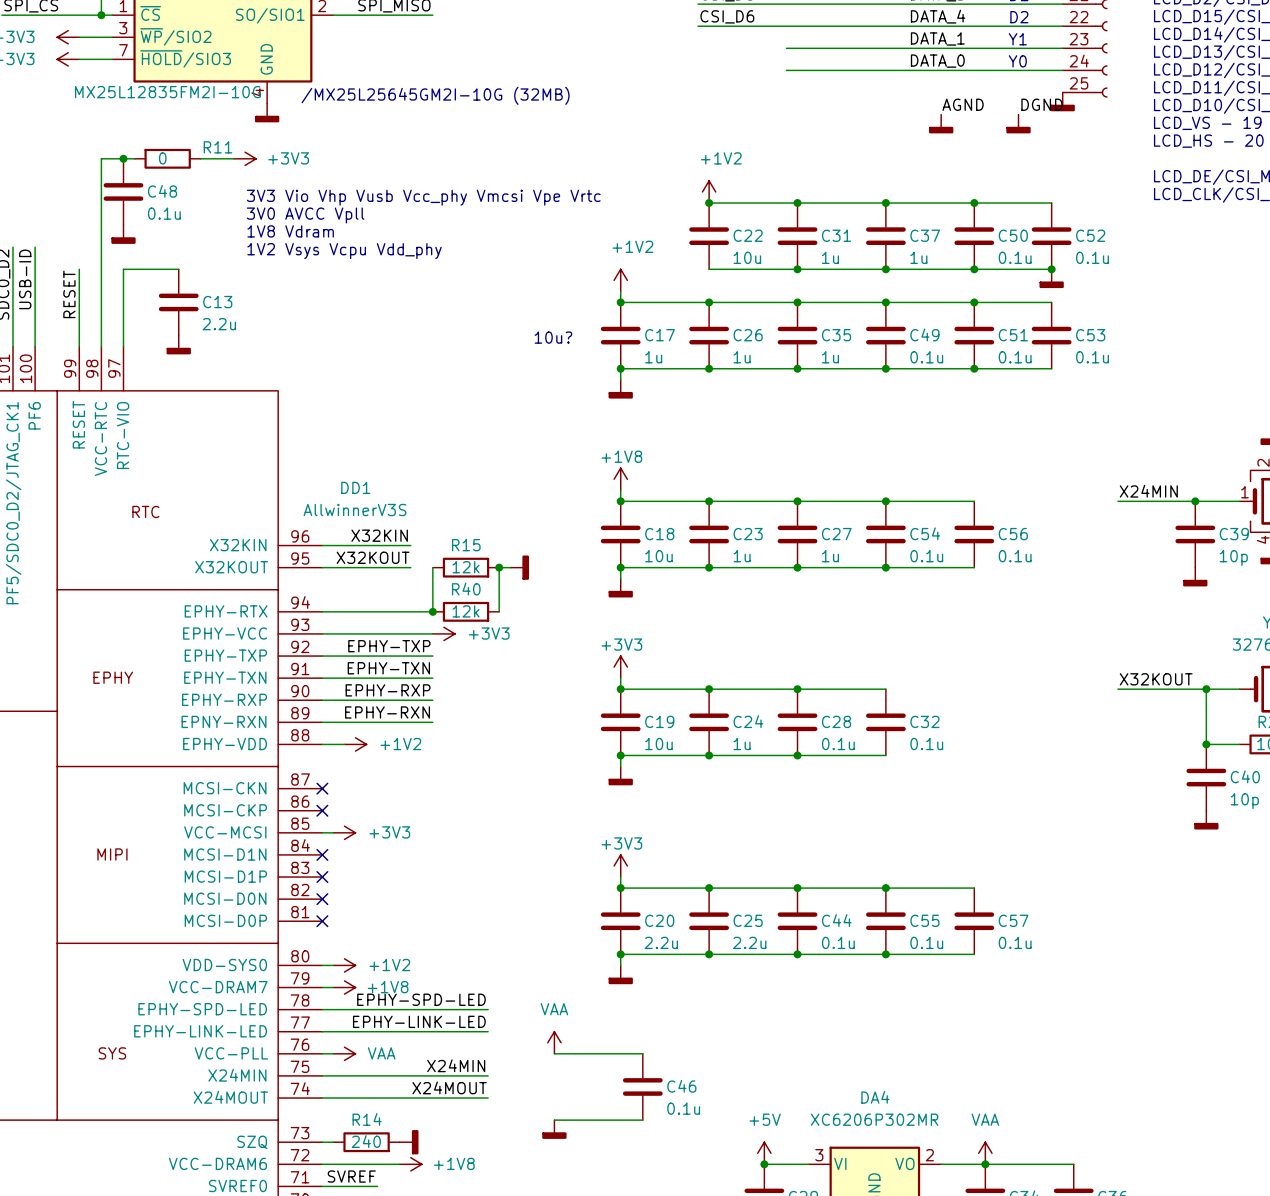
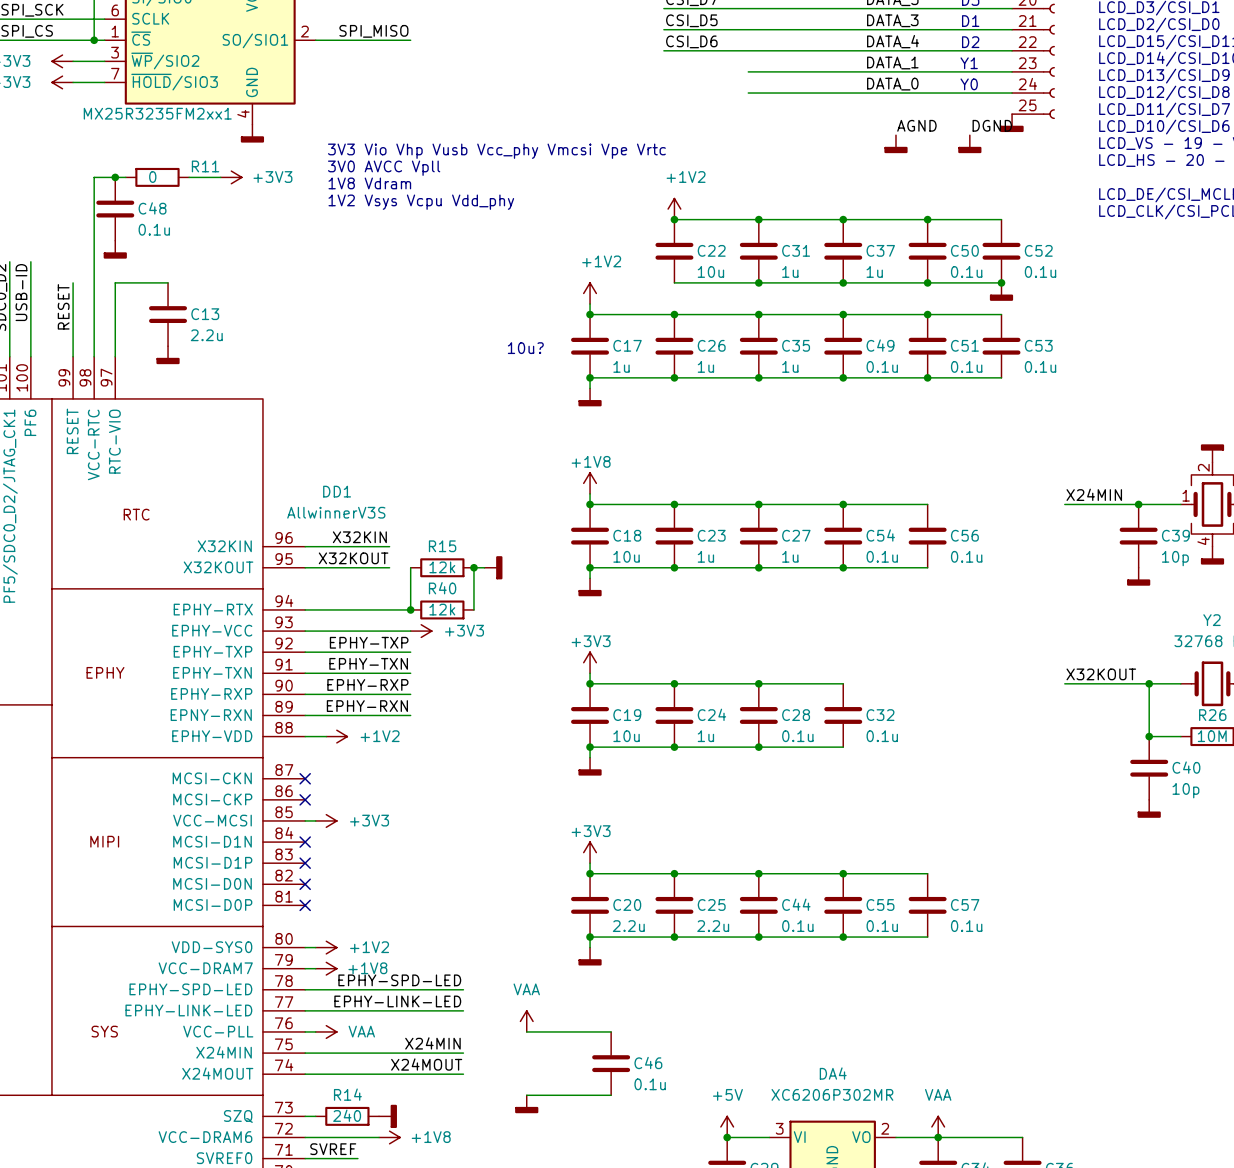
part value: MX25L12835FM2I-10G (167, 92) -> MX25R3235FM2xx1 (157, 113)
text: /MX25L25645GM2I-10G (32MB) (435, 95) -> none
text position: 3V3 Vio Vhp Vusb Vcc_phy Vmcsi Vpe Vrtc (423, 197) -> 3V3 Vio Vhp Vusb Vcc_phy Vmcsi Vpe Vrtc (496, 151)
text position: 3V0 AVCC Vpll (305, 215) -> 3V0 AVCC Vpll (384, 168)
text position: 1V8 Vdram (290, 231) -> 1V8 Vdram (369, 183)
text position: 1V2 Vsys Vcpu Vdd_phy (344, 251) -> 1V2 Vsys Vcpu Vdd_phy (421, 202)

